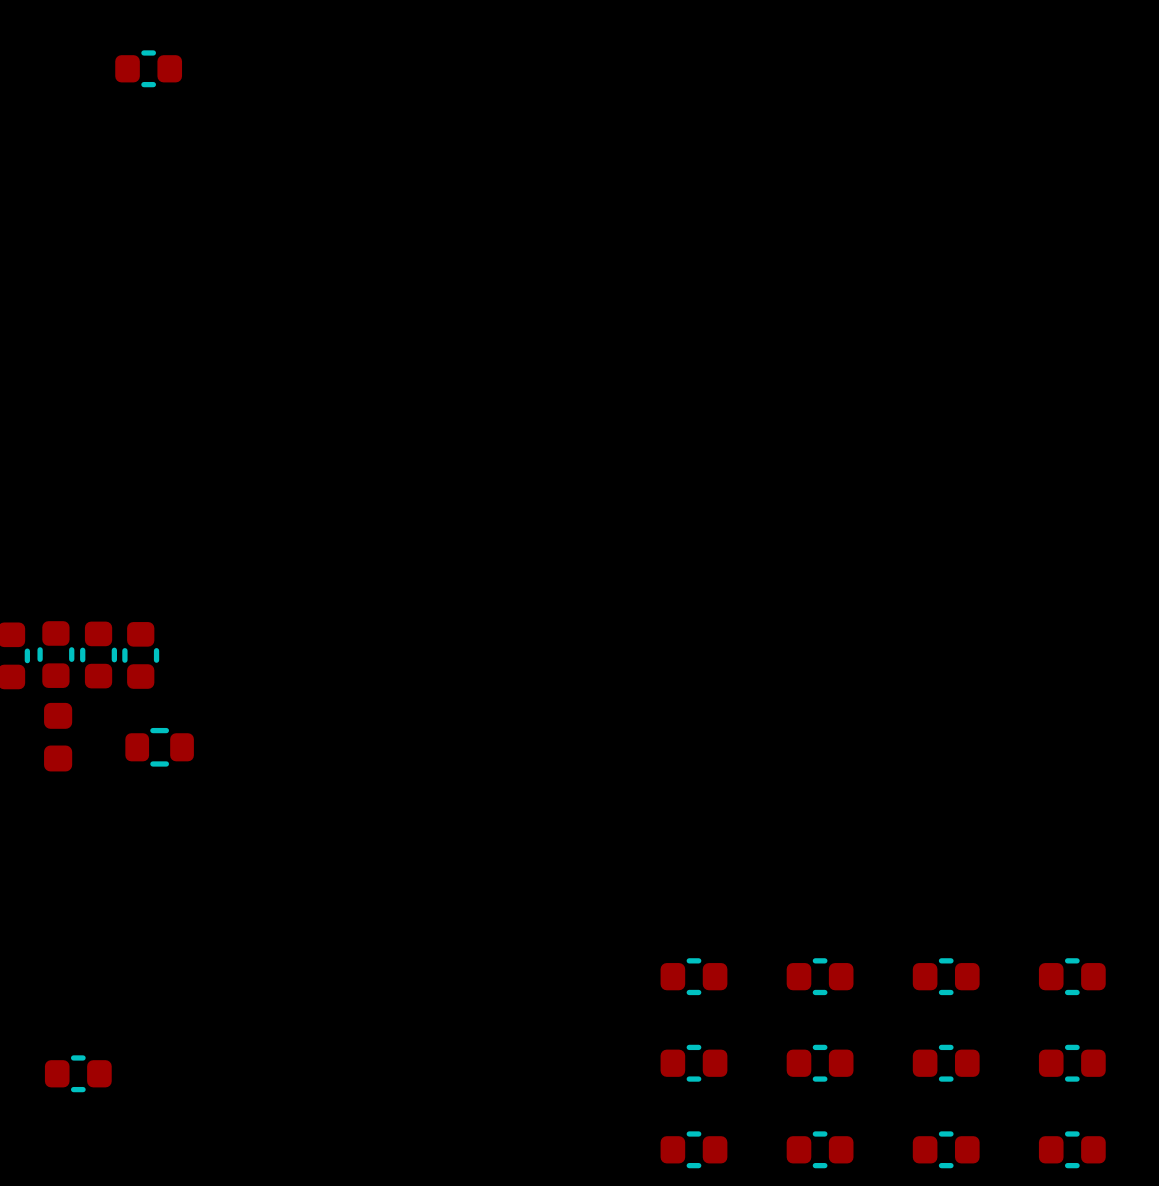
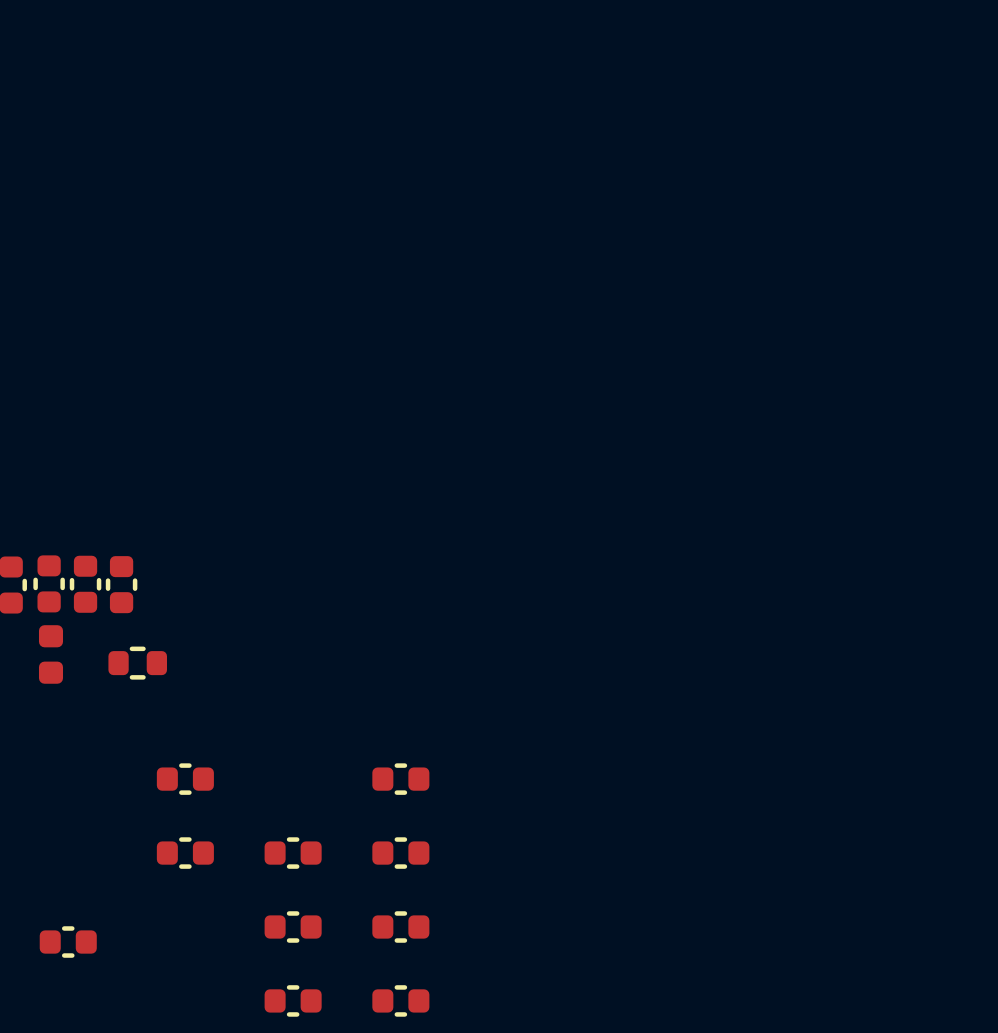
part: (148, 68) -> none
part: none -> (185, 779)
part: none -> (400, 779)
part: none -> (185, 853)
part: none -> (293, 853)
part: none -> (400, 853)
part: (693, 976) -> none
part: (820, 976) -> none
part: (946, 976) -> none
part: (1072, 976) -> none
part: none -> (293, 927)
part: none -> (400, 927)
part: (693, 1063) -> none
part: (820, 1063) -> none
part: (946, 1063) -> none
part: (1072, 1063) -> none
part: none -> (293, 1000)
part: none -> (400, 1000)
part: (693, 1149) -> none
part: (820, 1149) -> none
part: (946, 1149) -> none
part: (1072, 1149) -> none

